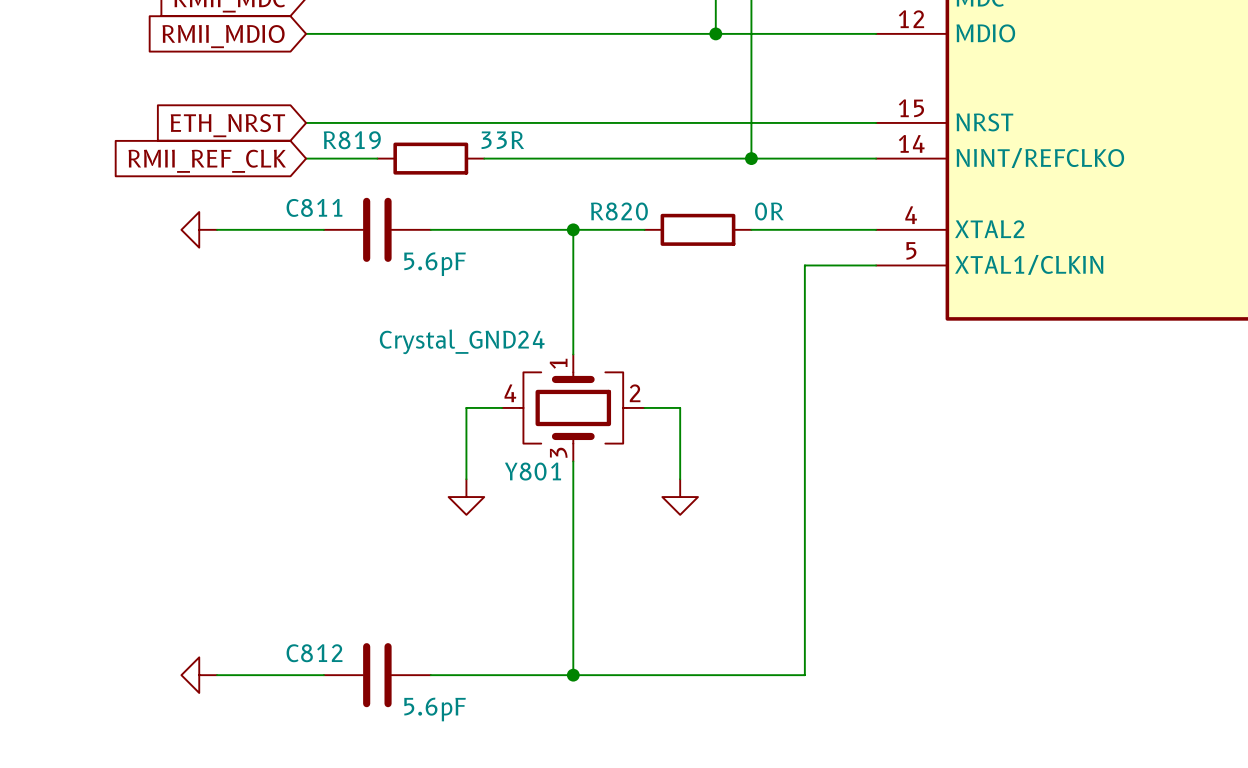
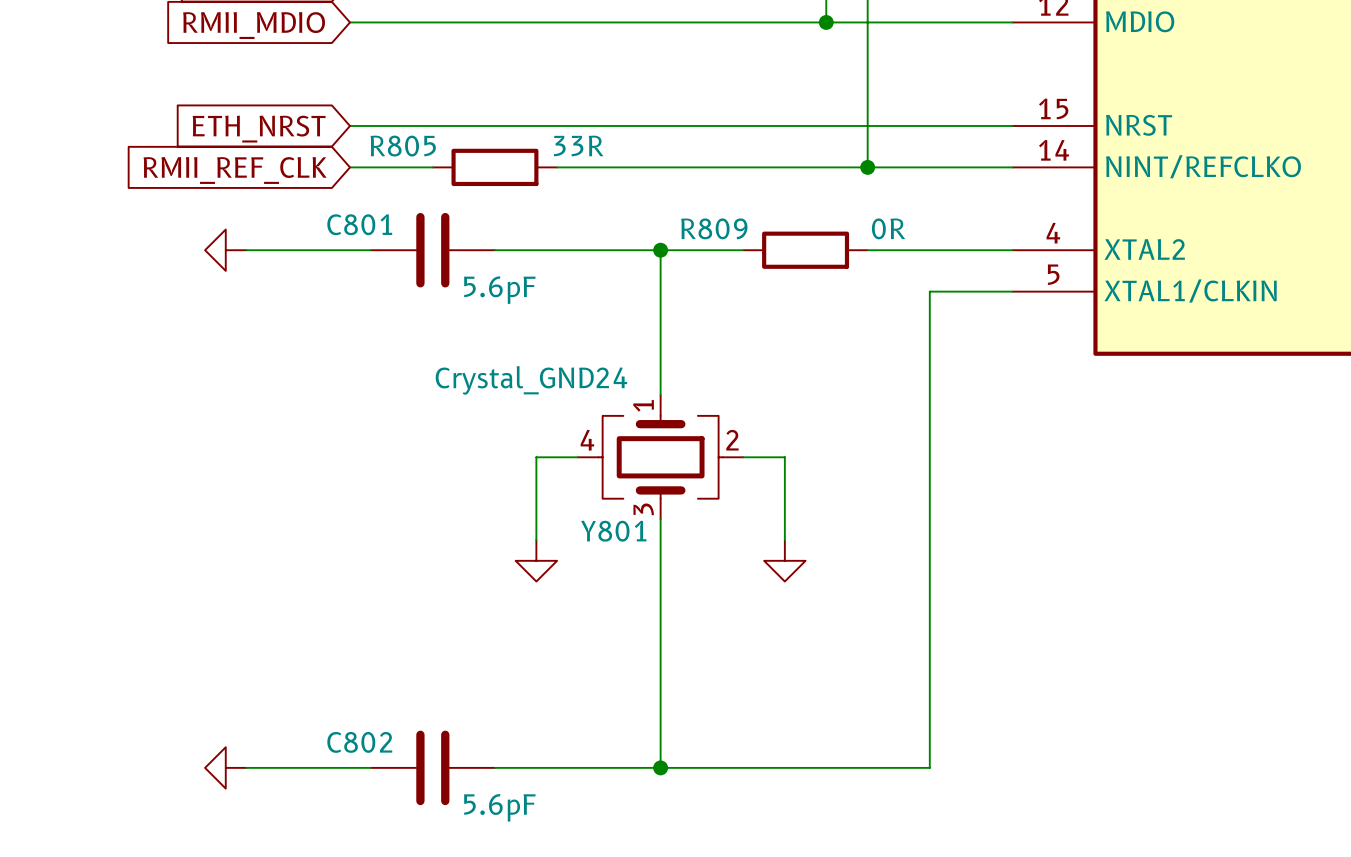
R819 name: R819 (352, 140) -> R805 (403, 146)
C811 name: C811 (314, 207) -> C801 (359, 224)
R820 name: R820 (619, 211) -> R809 (714, 228)
C812 name: C812 (314, 653) -> C802 (359, 742)

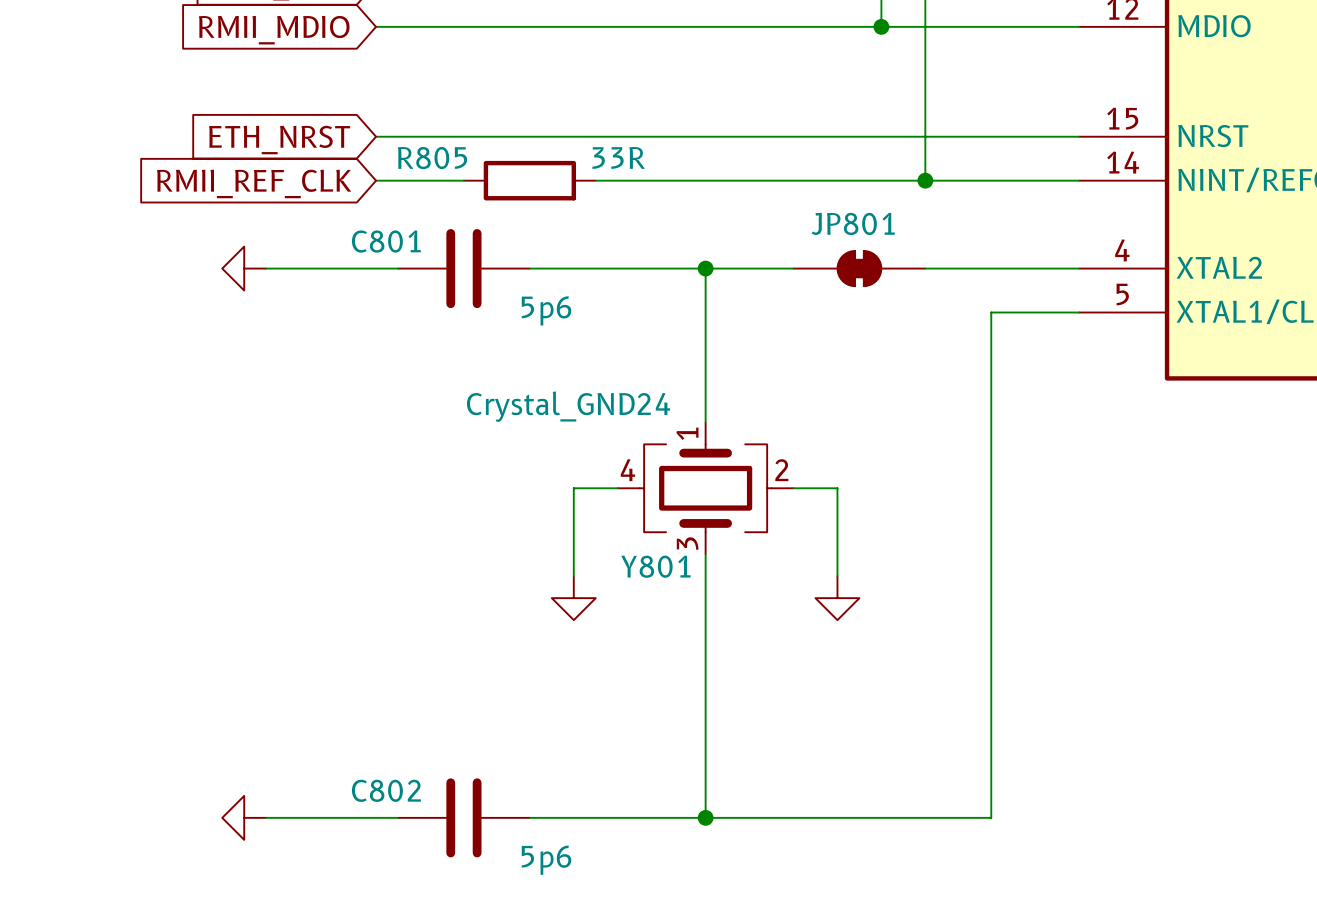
R809: 0R (805, 250) -> none
JP801: none -> (859, 268)
C801 value: 5.6pF (499, 290) -> 5p6 (546, 310)
C802 value: 5.6pF (499, 807) -> 5p6 (546, 860)

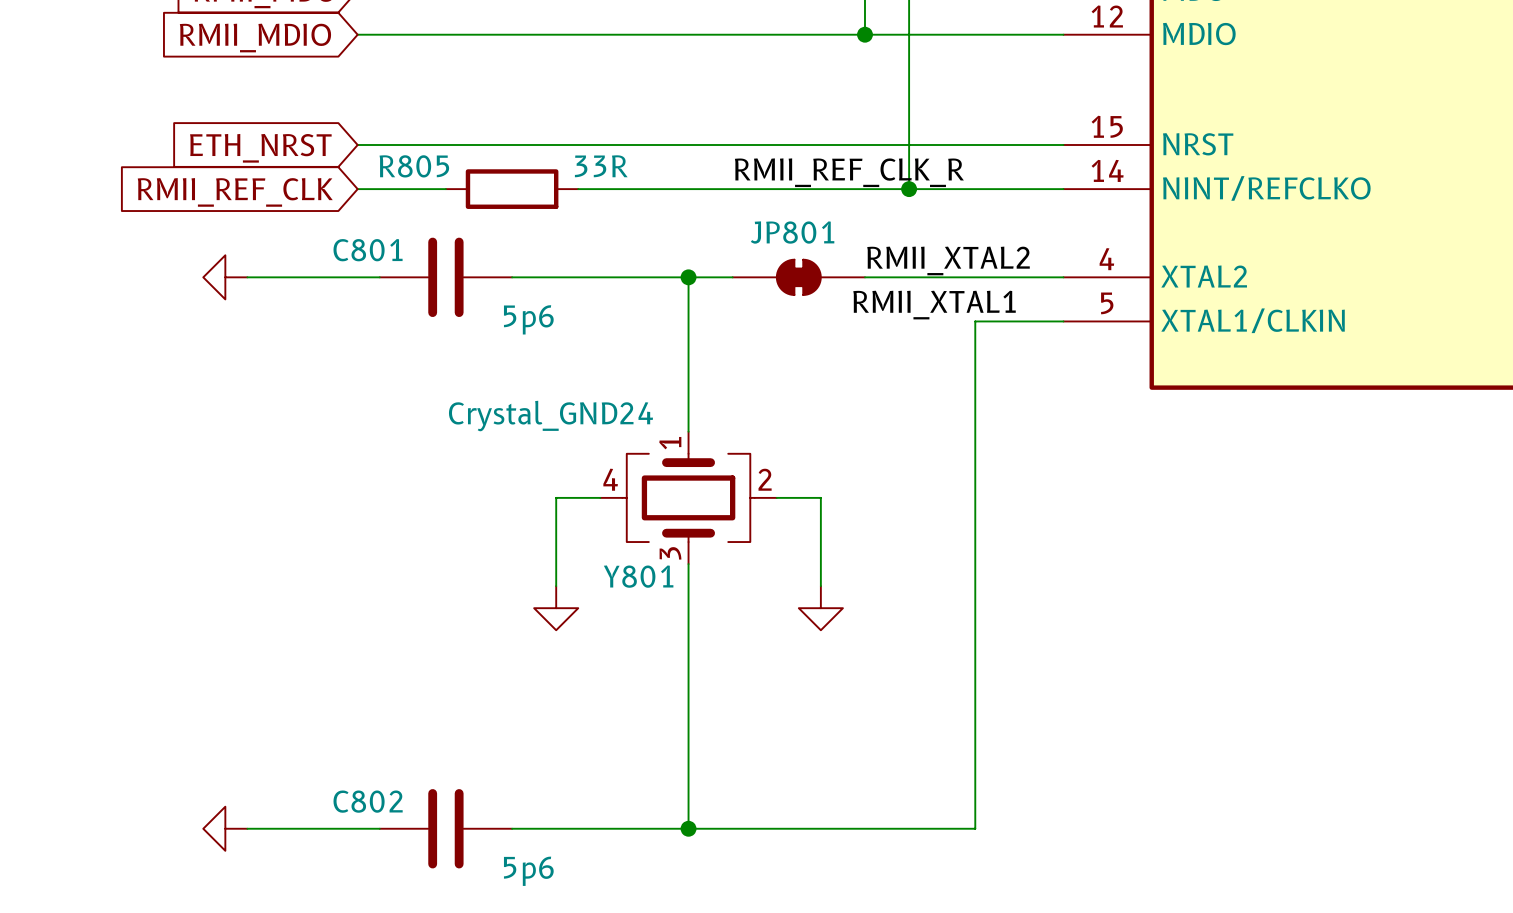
label: none -> RMII_REF_CLK_R (849, 172)
label: none -> RMII_XTAL2 (948, 260)
JP801 position: (859, 268) -> (798, 277)
label: none -> RMII_XTAL1 (934, 305)

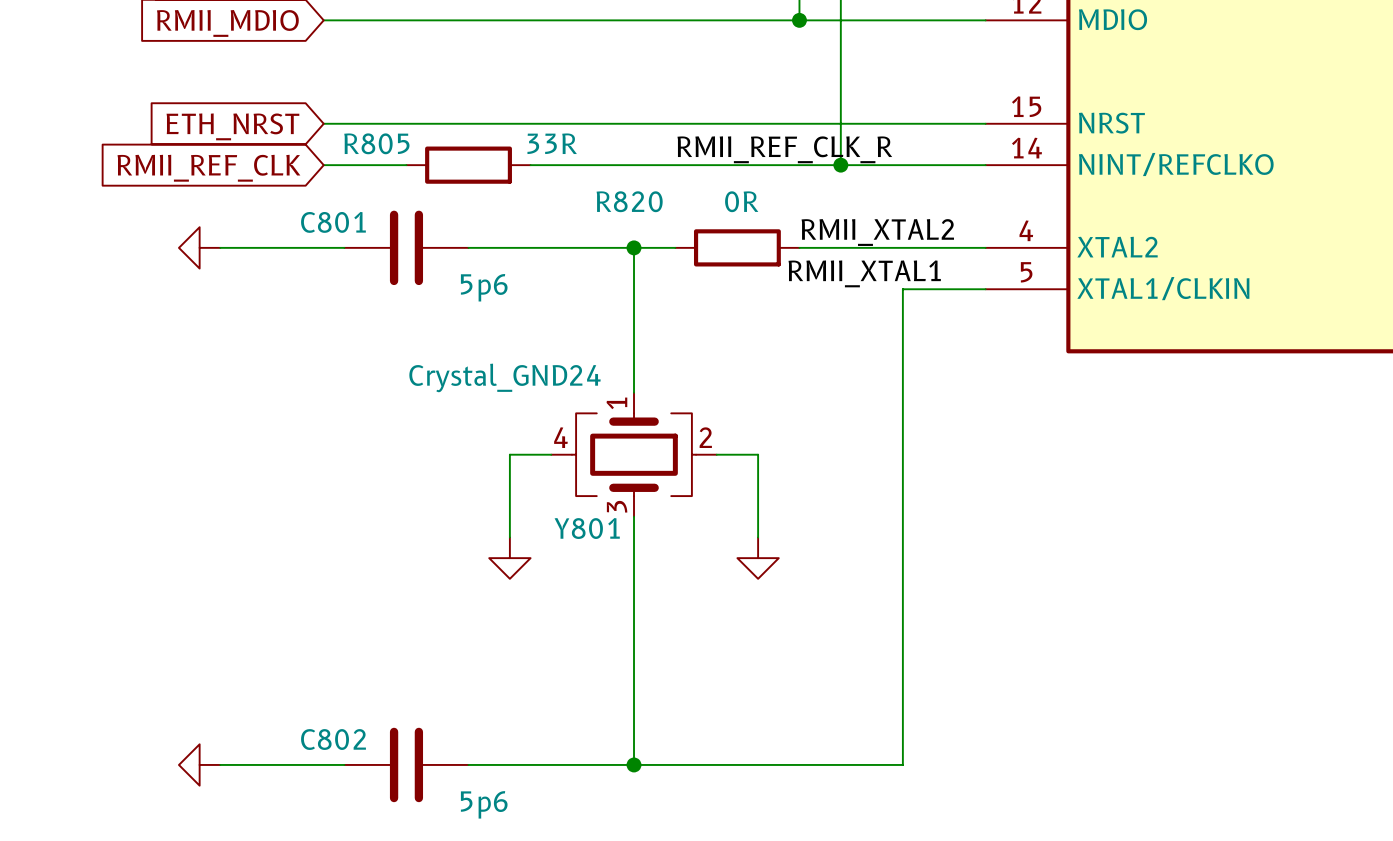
JP801: (798, 277) -> none
R820: none -> 0R (737, 247)

